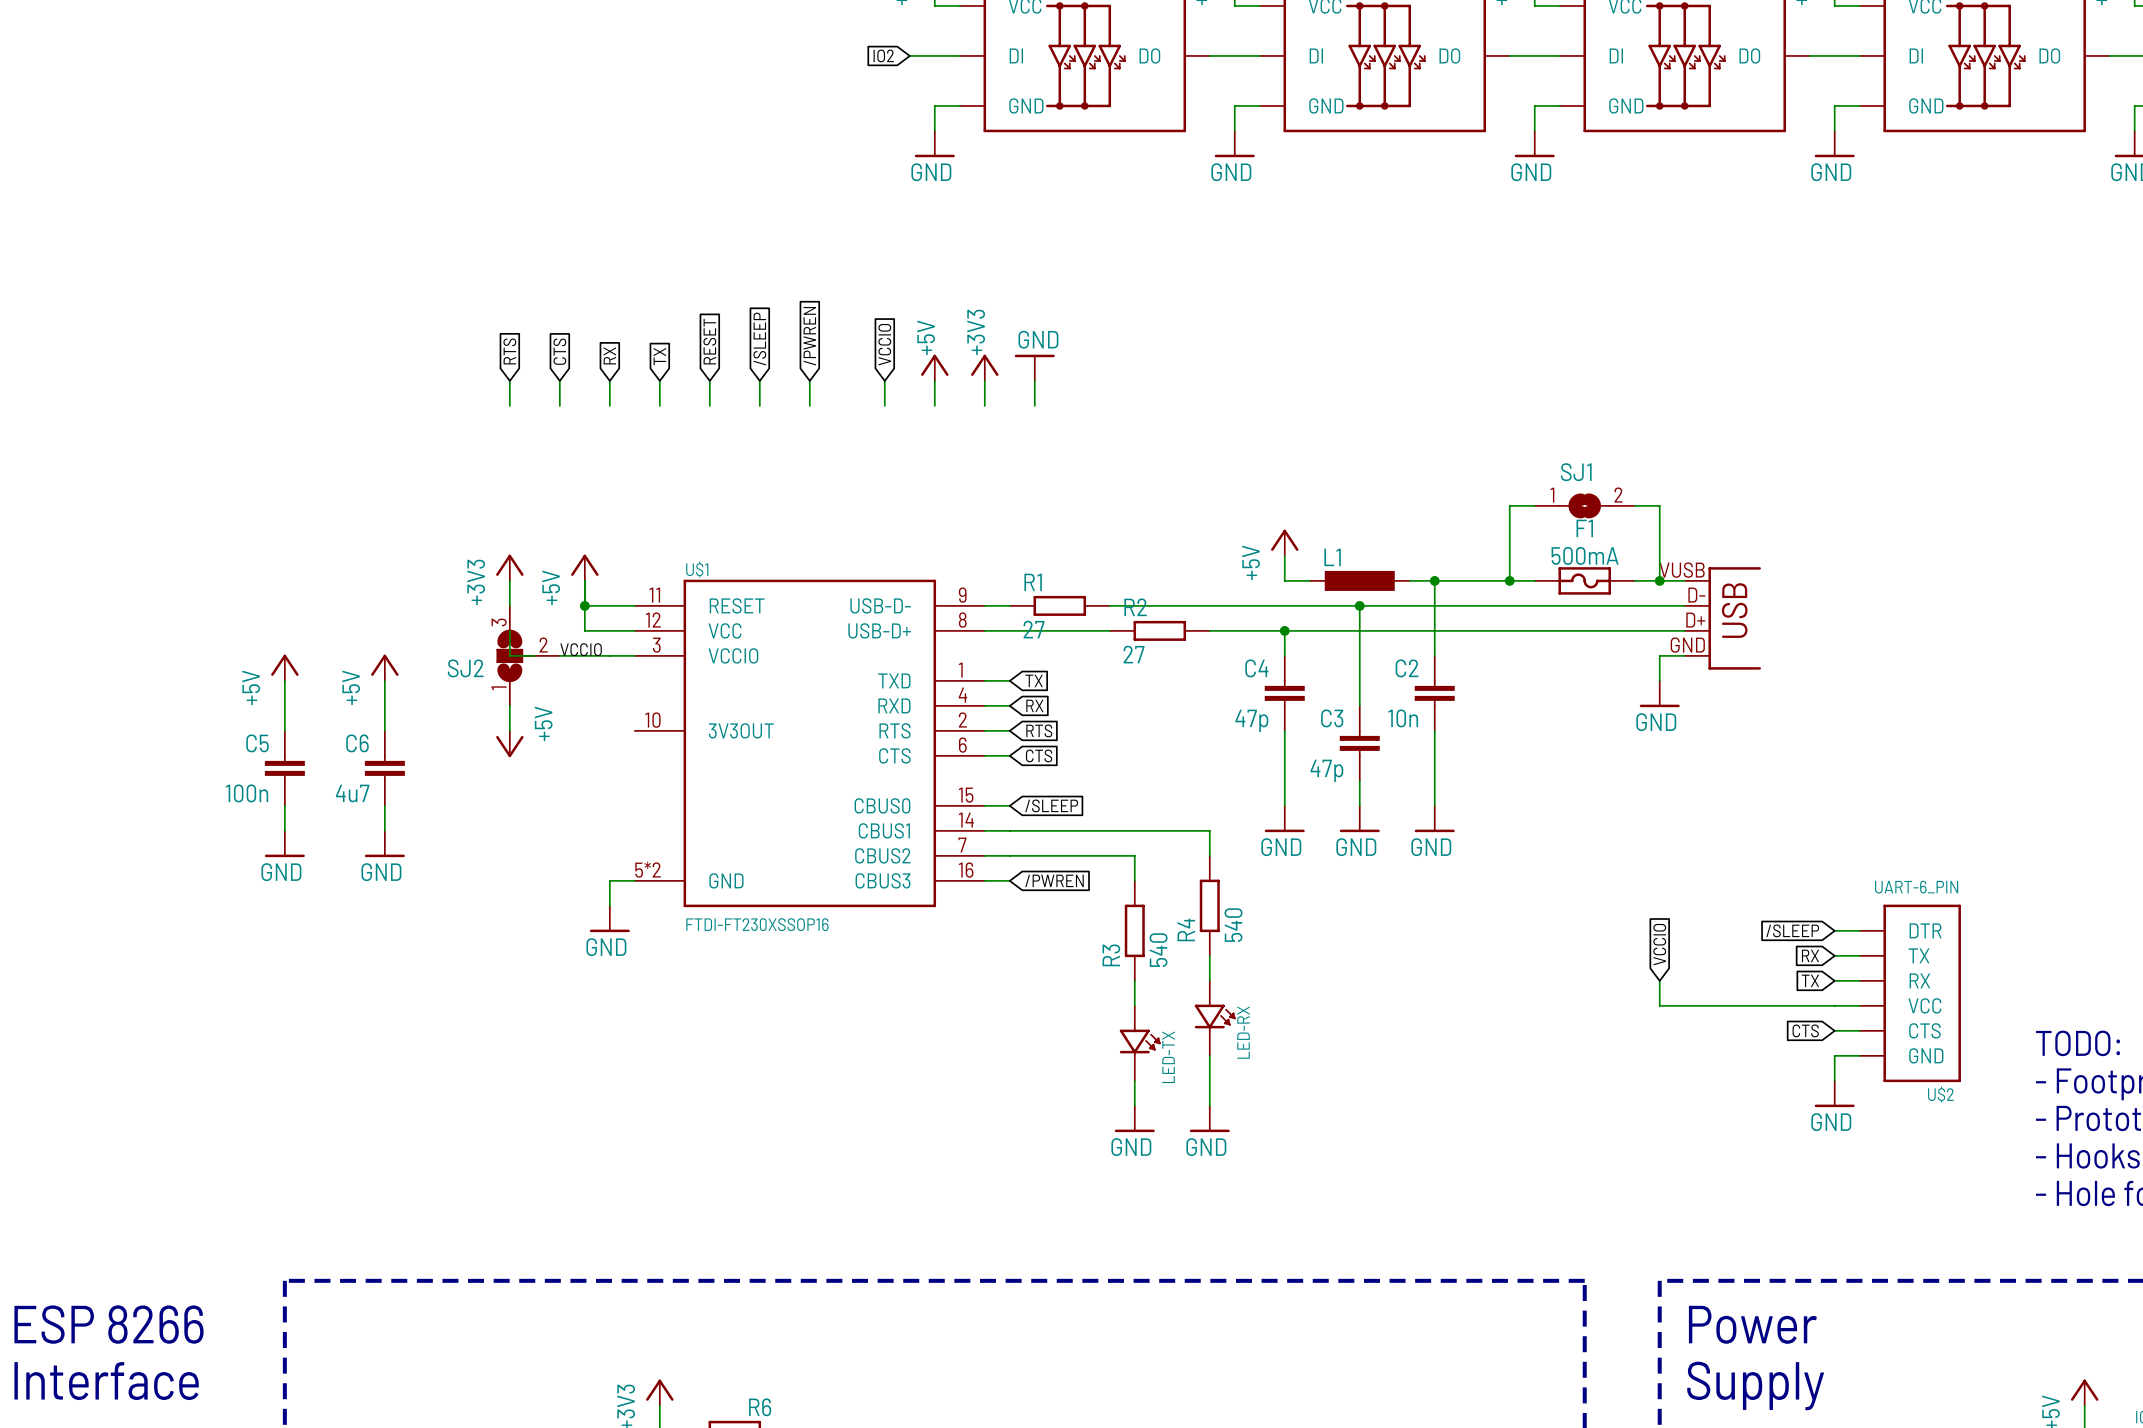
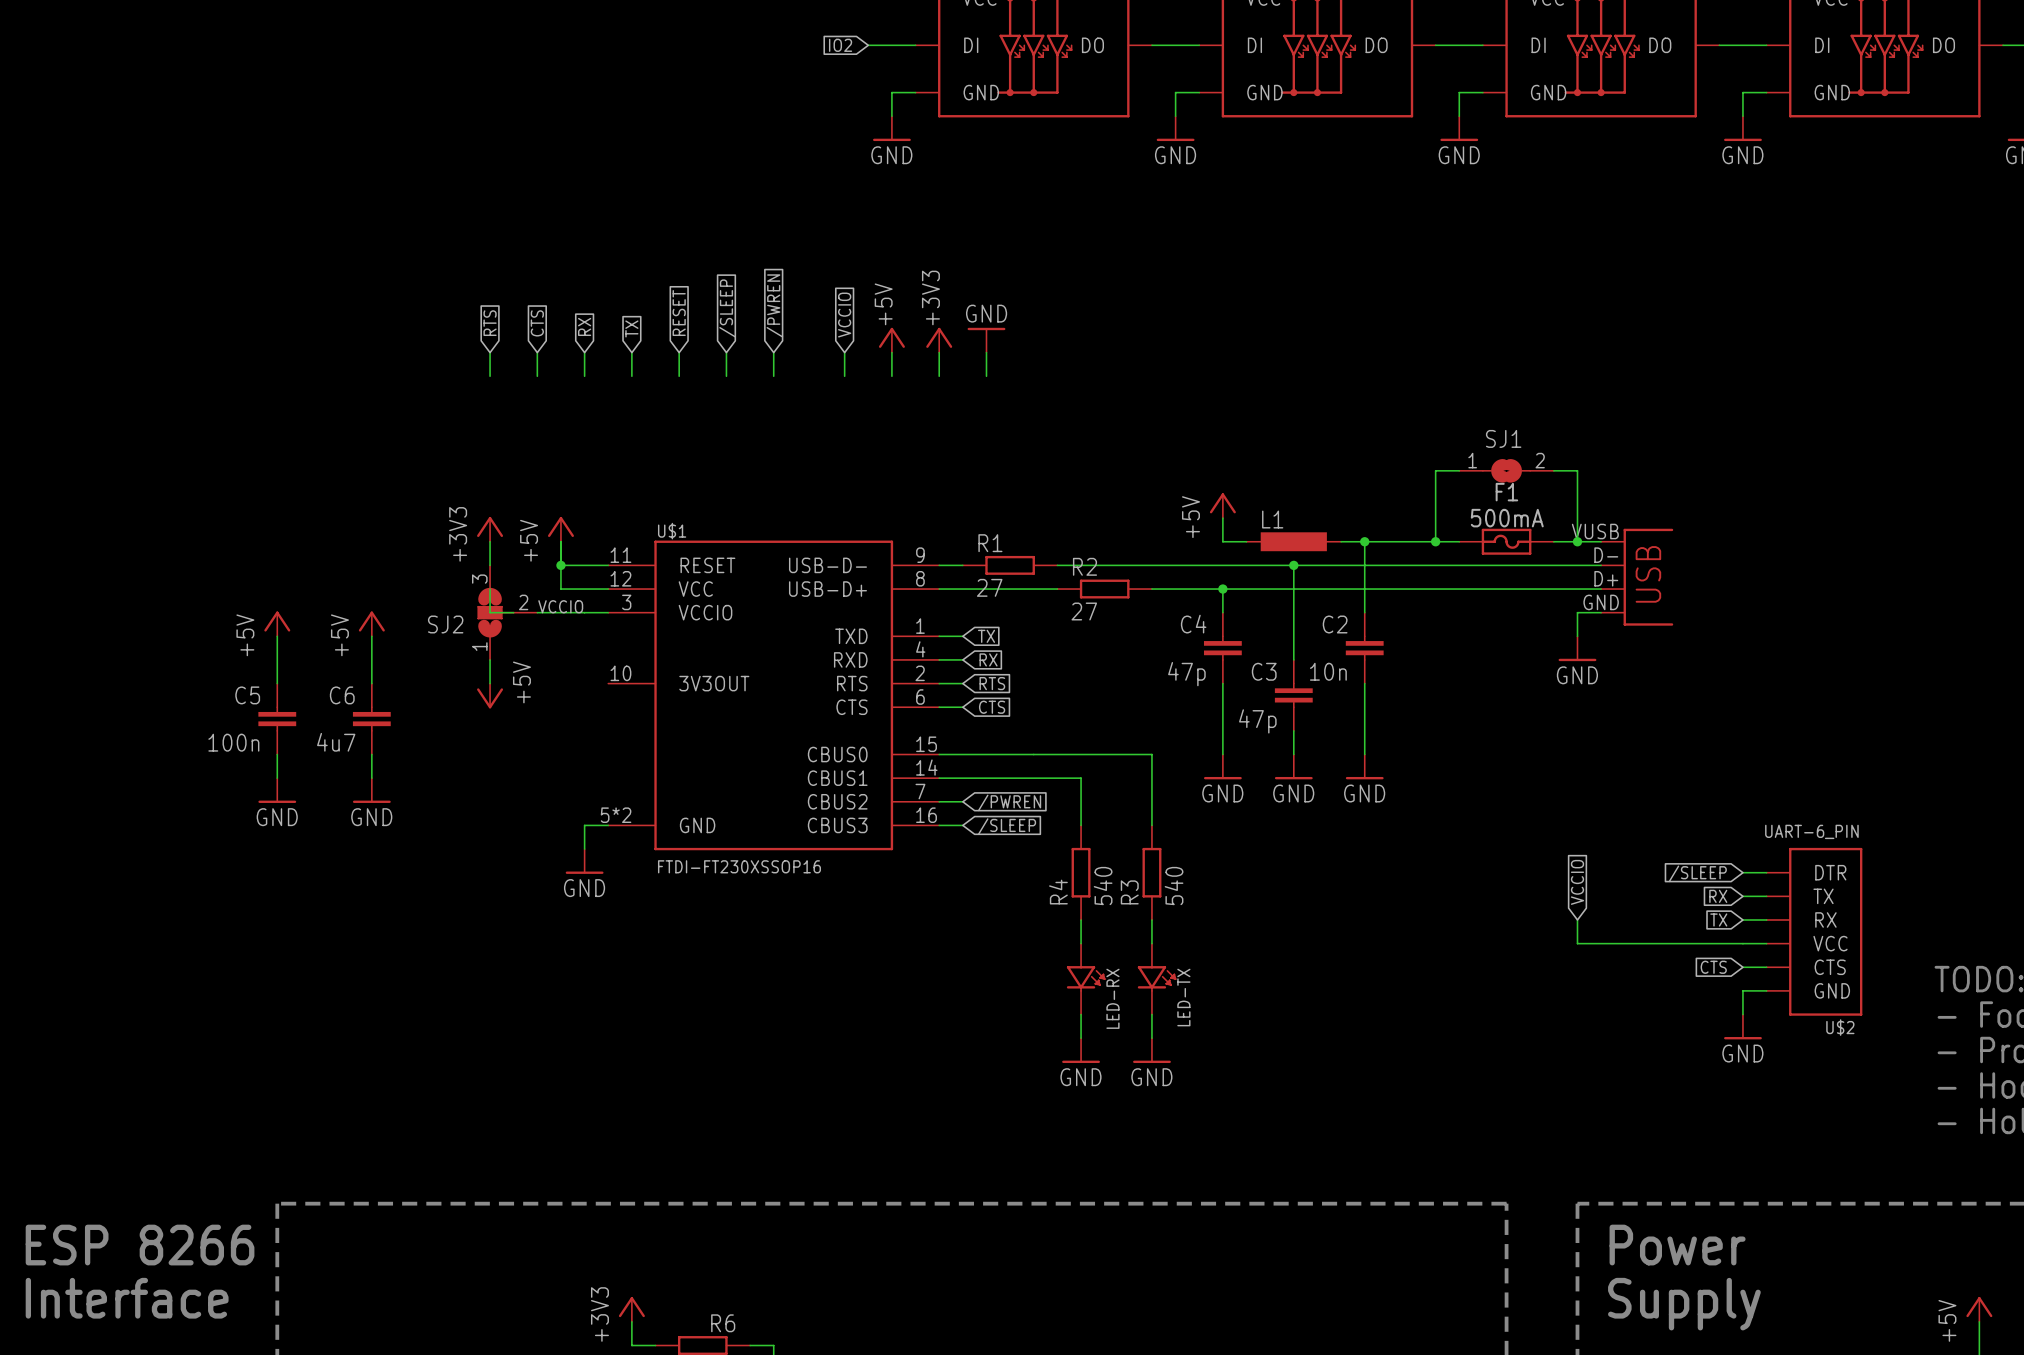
wire: none -> (962, 754) (1151, 754) (1151, 778)
global label: /SLEEP (1051, 805) -> none
wire: (1134, 830) (1209, 830) -> (1081, 778) (1081, 801)
wire: (1009, 855) (1134, 855) -> none
global label: none -> /PWREN (1009, 802)
global label: /PWREN (1054, 880) -> /SLEEP (1007, 826)
R4: 540 (1209, 905) -> none
R3: none -> 540 (1151, 872)
R3 name: R3 (1111, 955) -> R4 (1058, 892)
LED-RX: (1215, 1018) -> none
LED-TX: none -> (1156, 979)
LED-TX name: LED-TX (1168, 1057) -> LED-RX (1112, 998)

